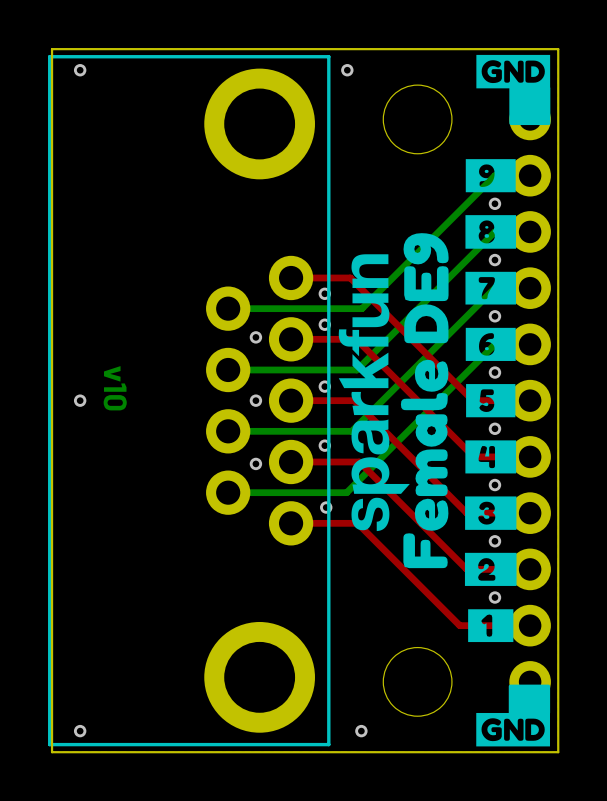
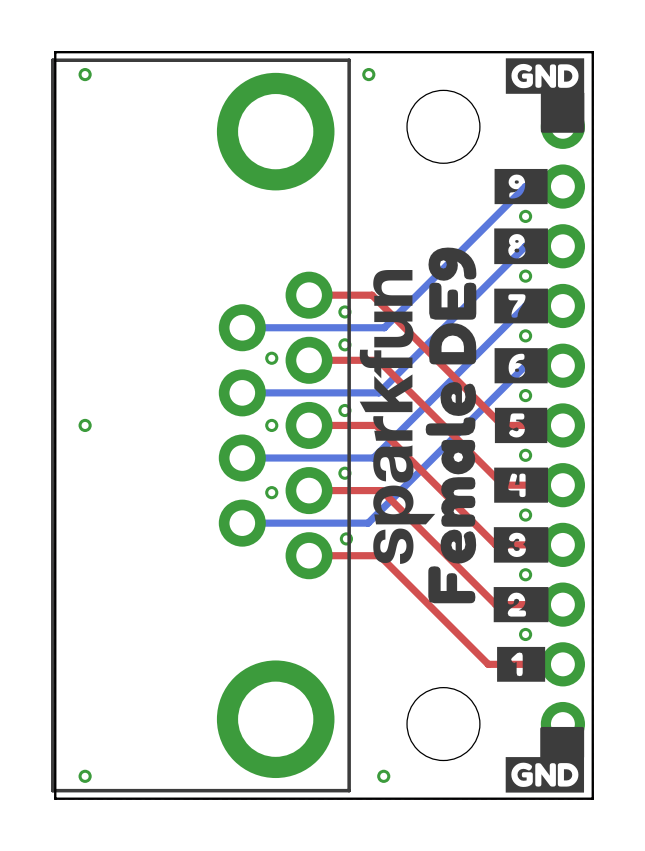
text: v10 (115, 388) -> none

